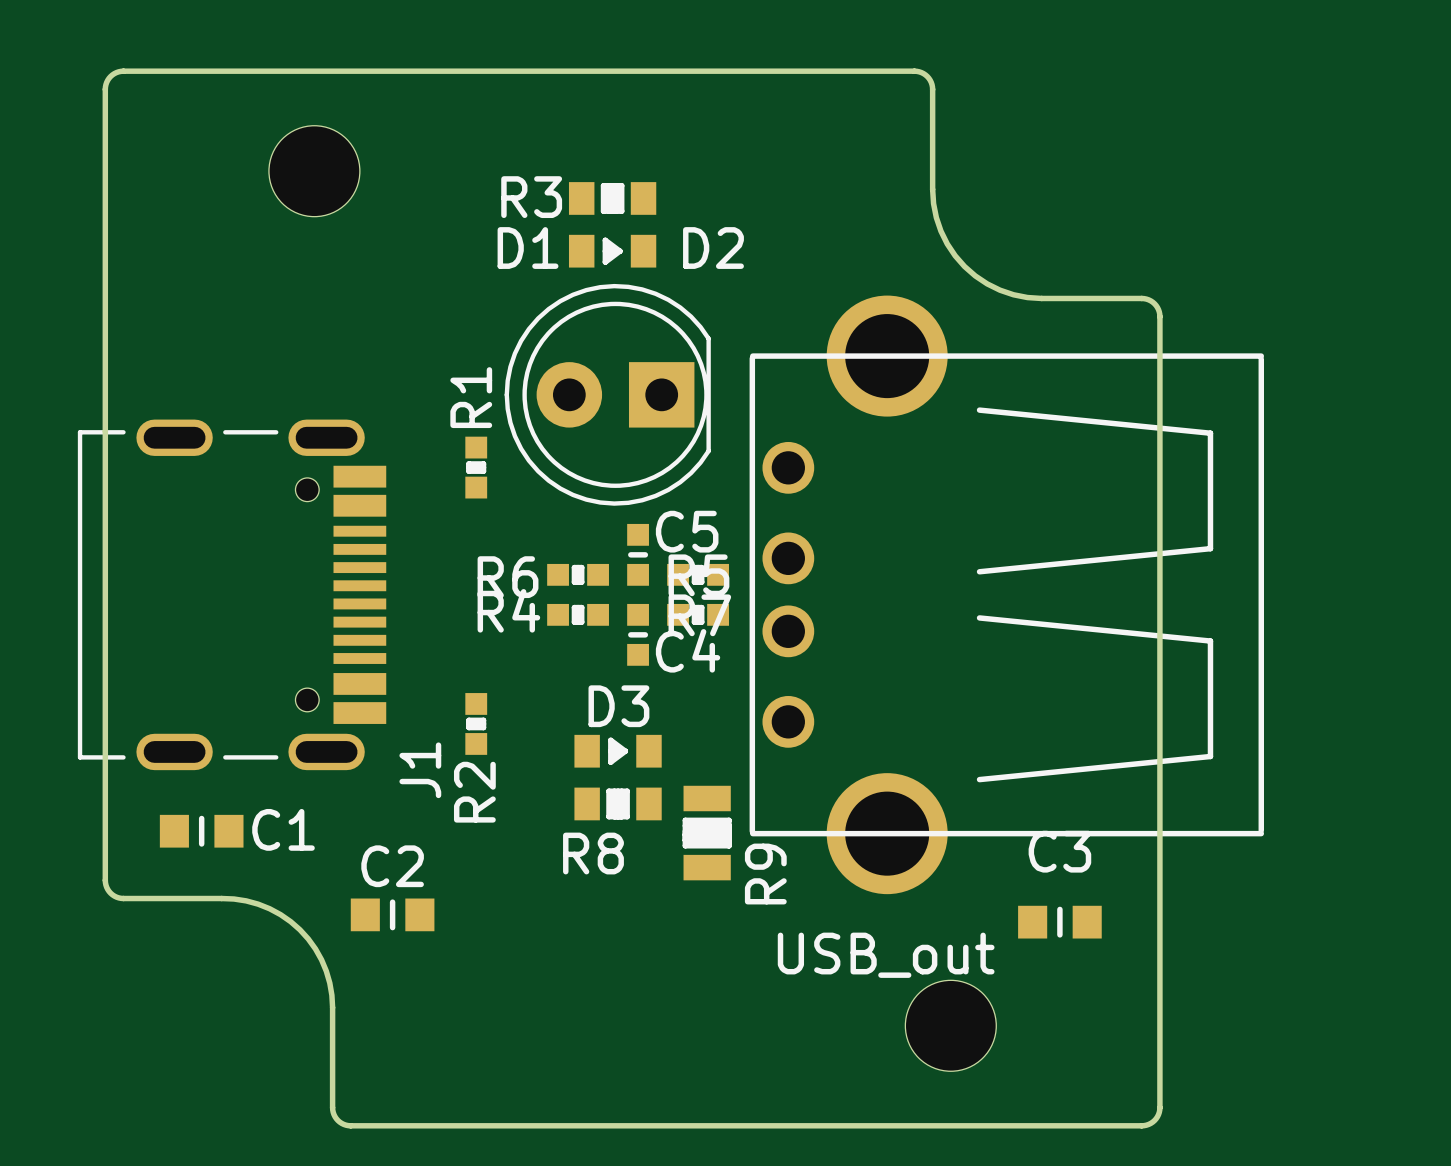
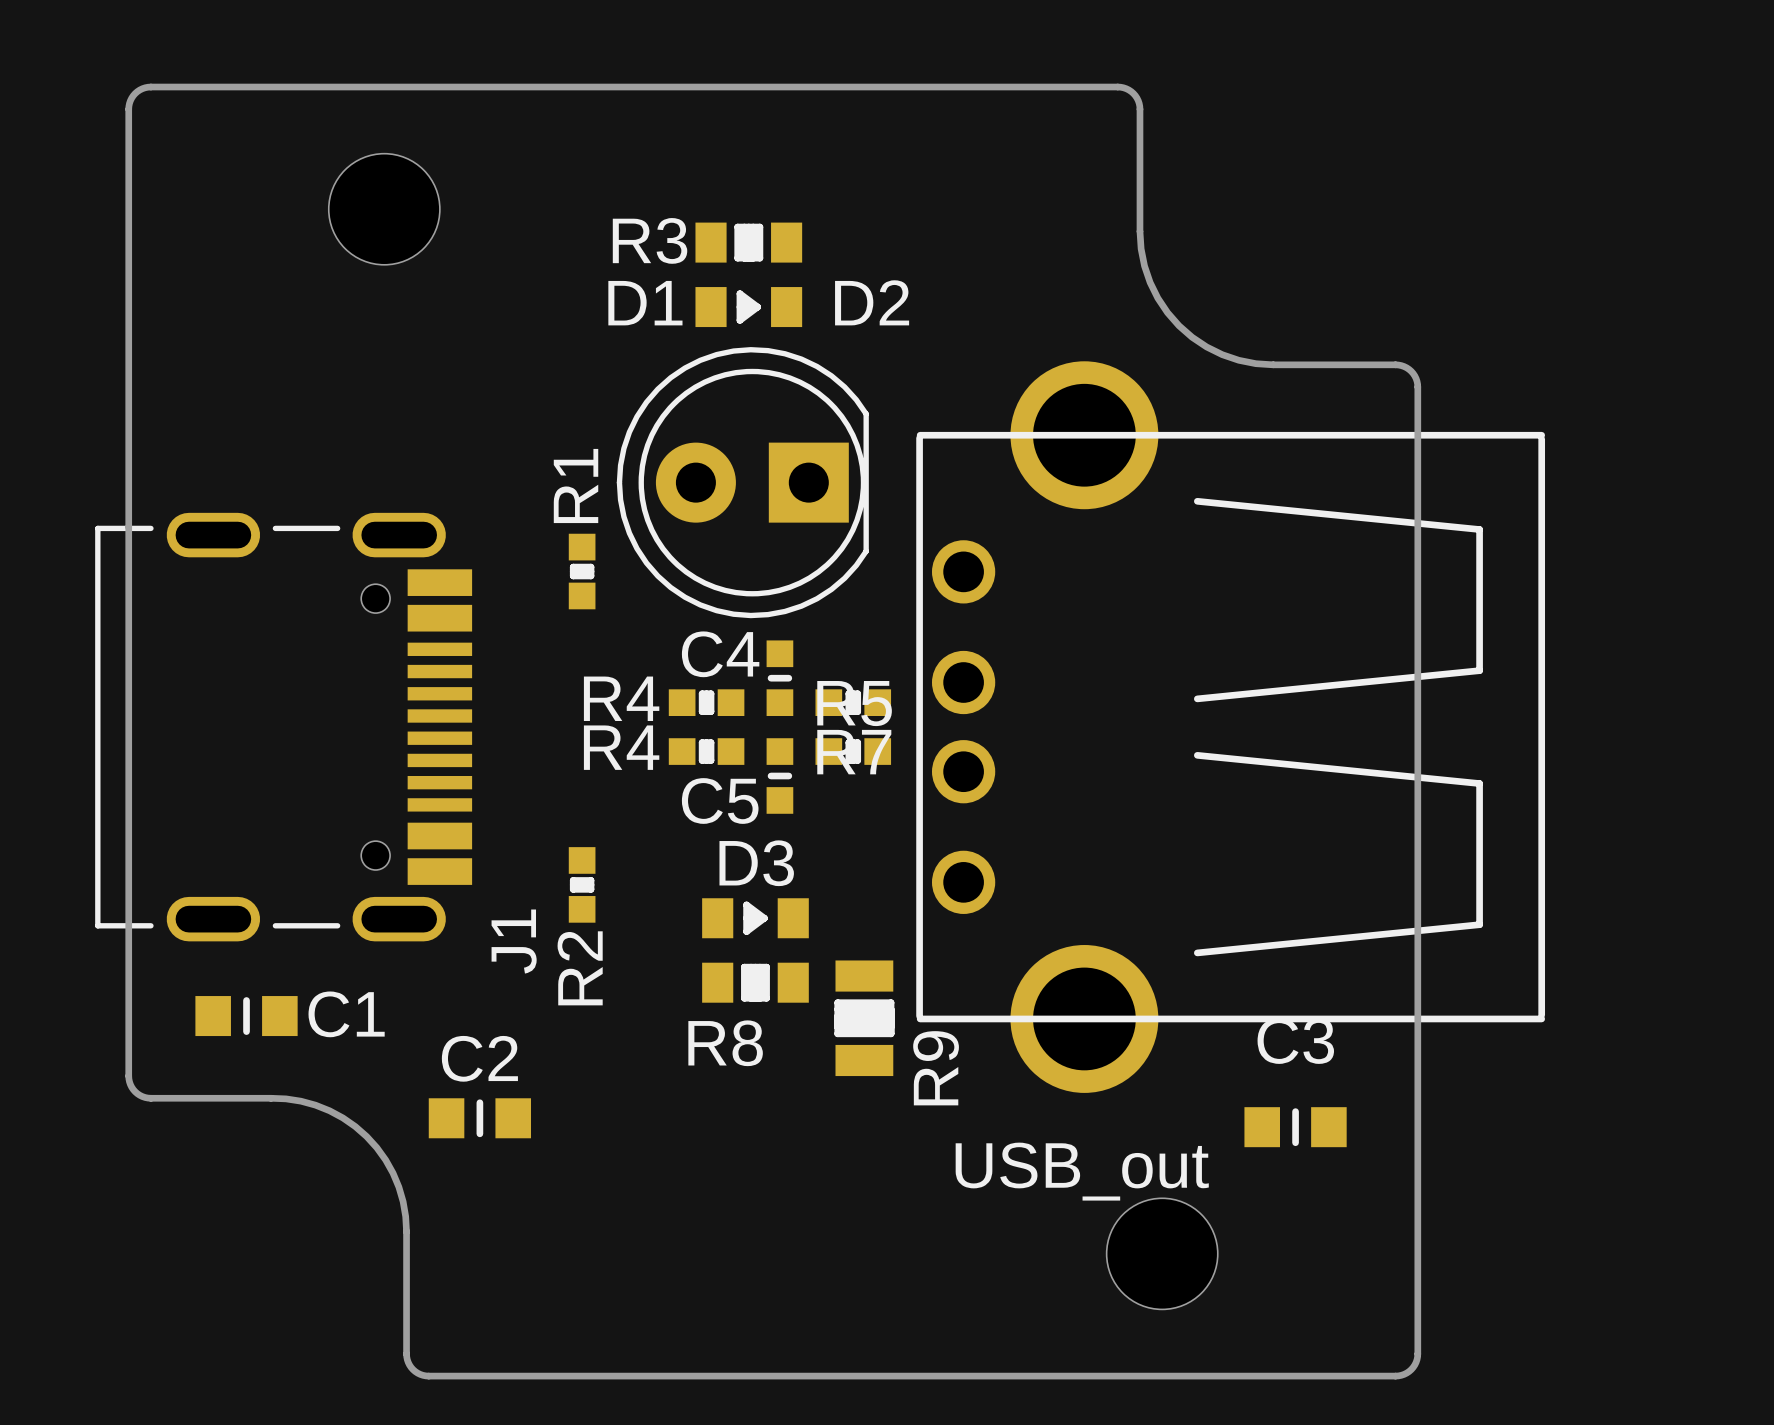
C5 name: C5 (687, 531) -> C4 (720, 654)
R6 name: R6 (508, 577) -> R4 (621, 698)
C4 name: C4 (688, 650) -> C5 (720, 800)

